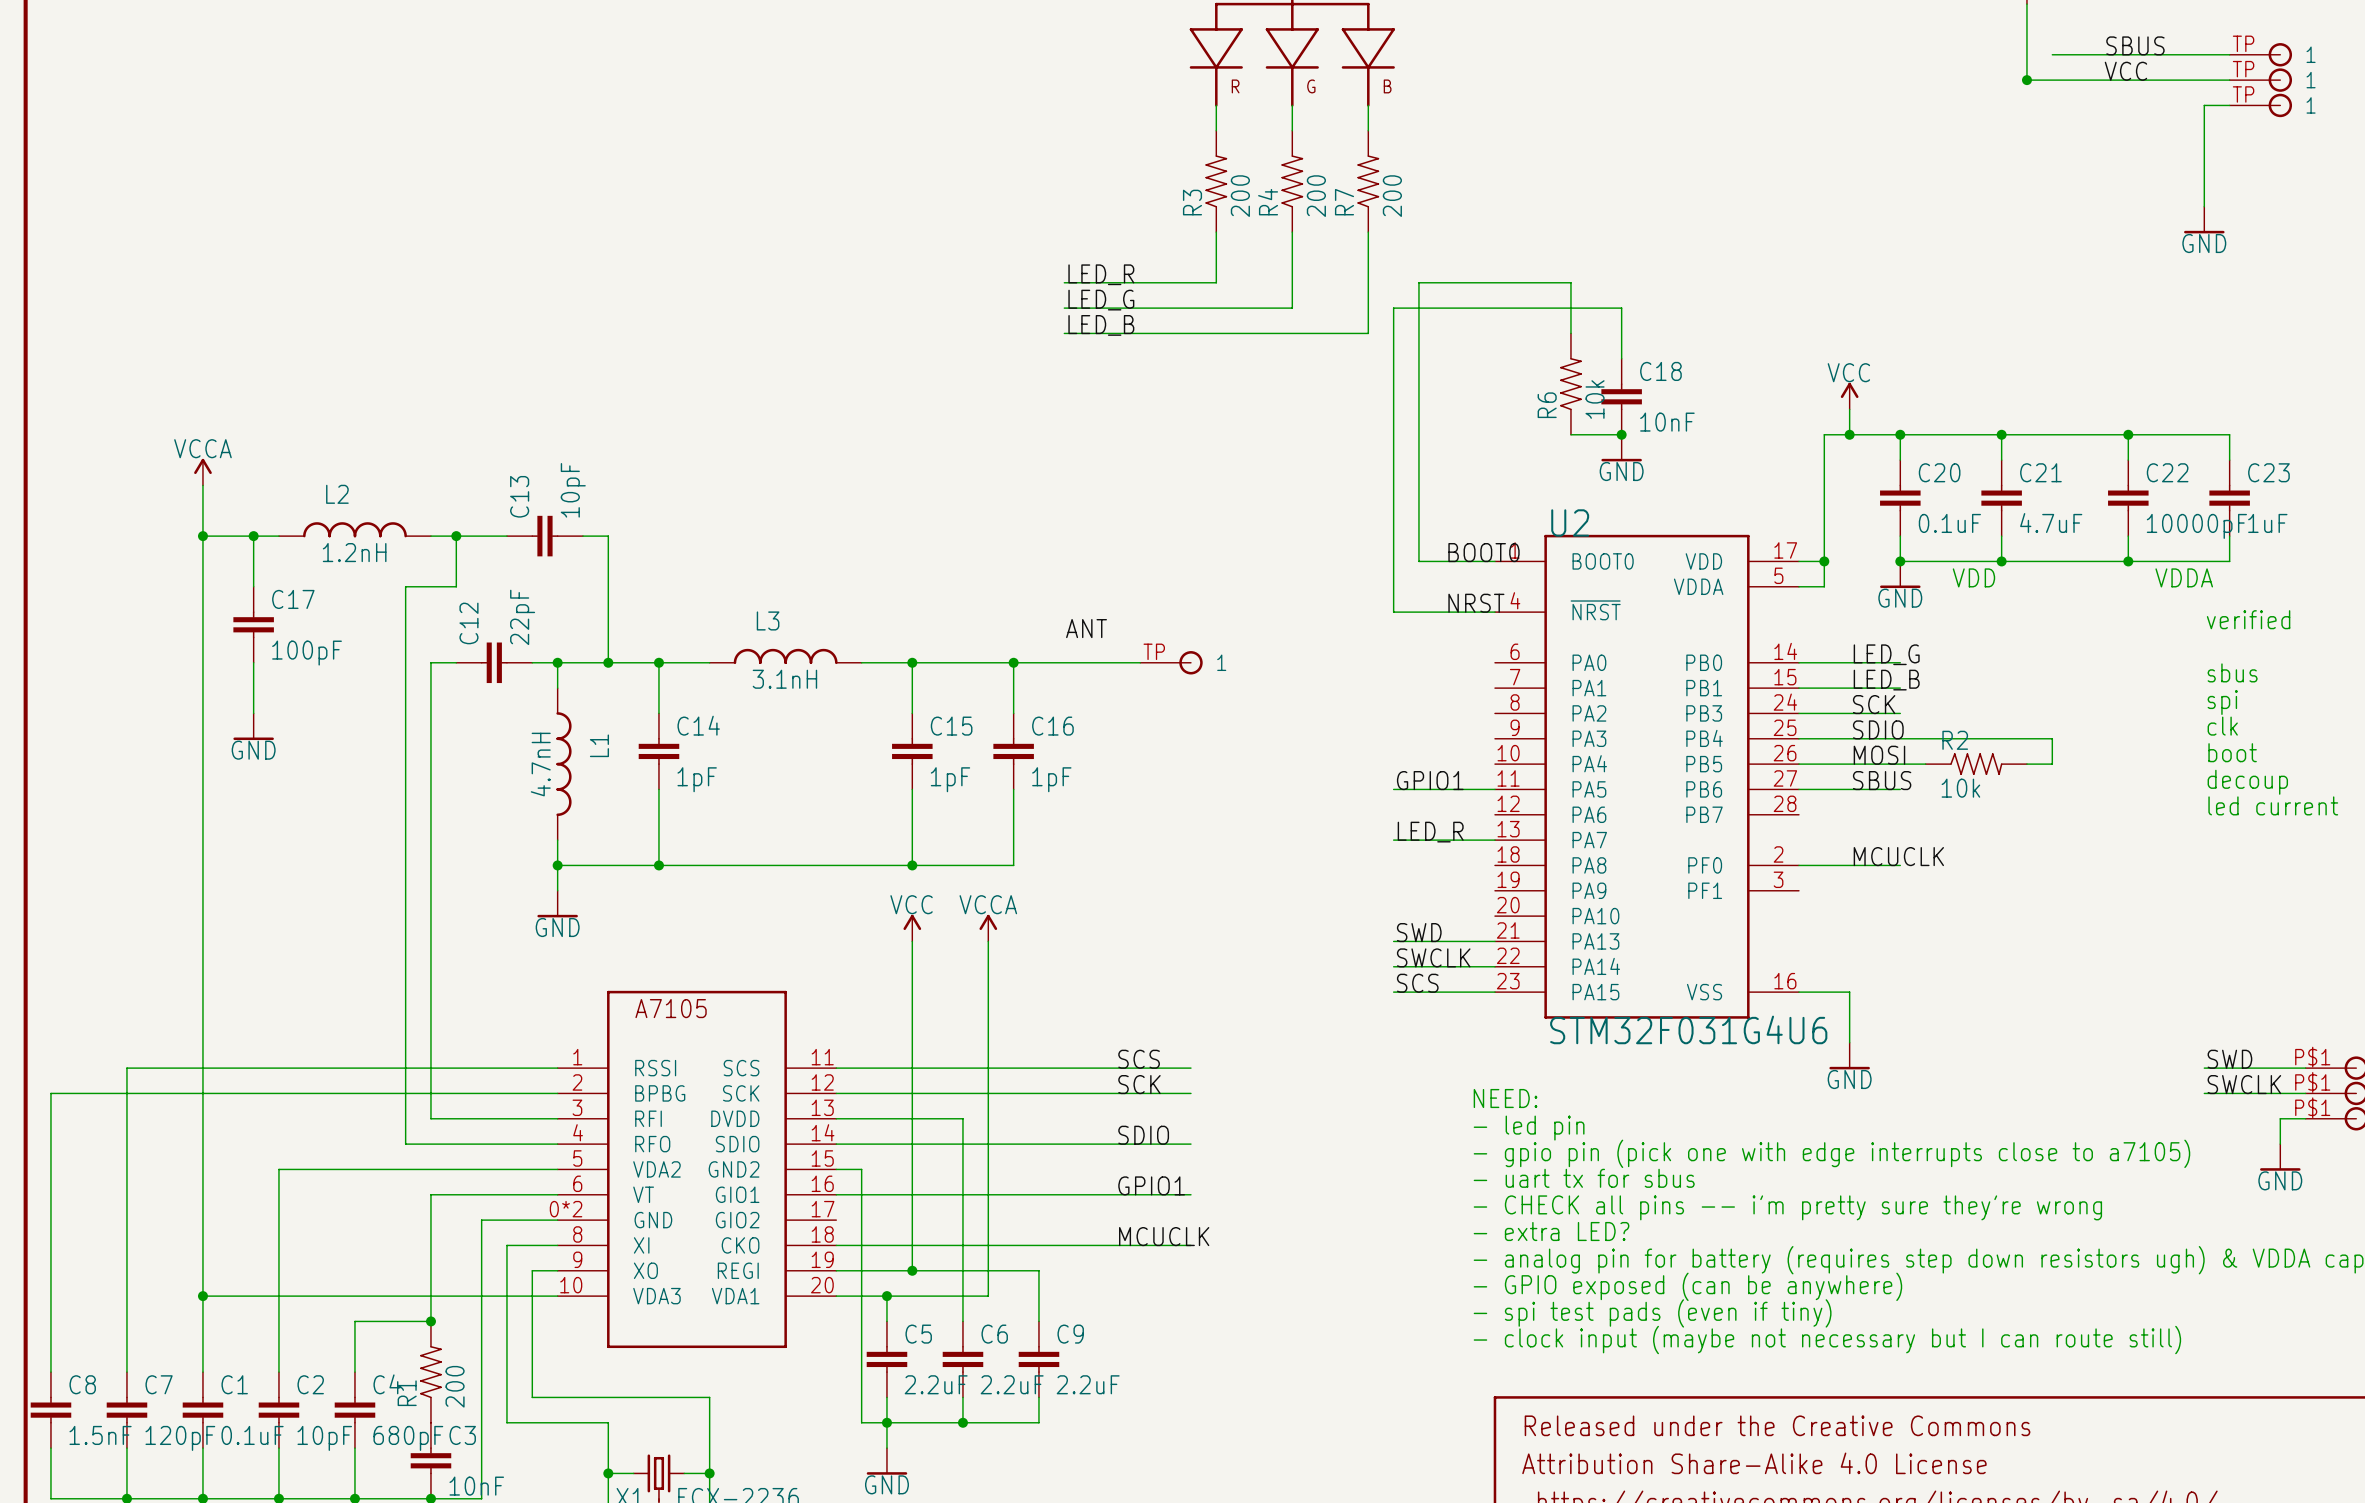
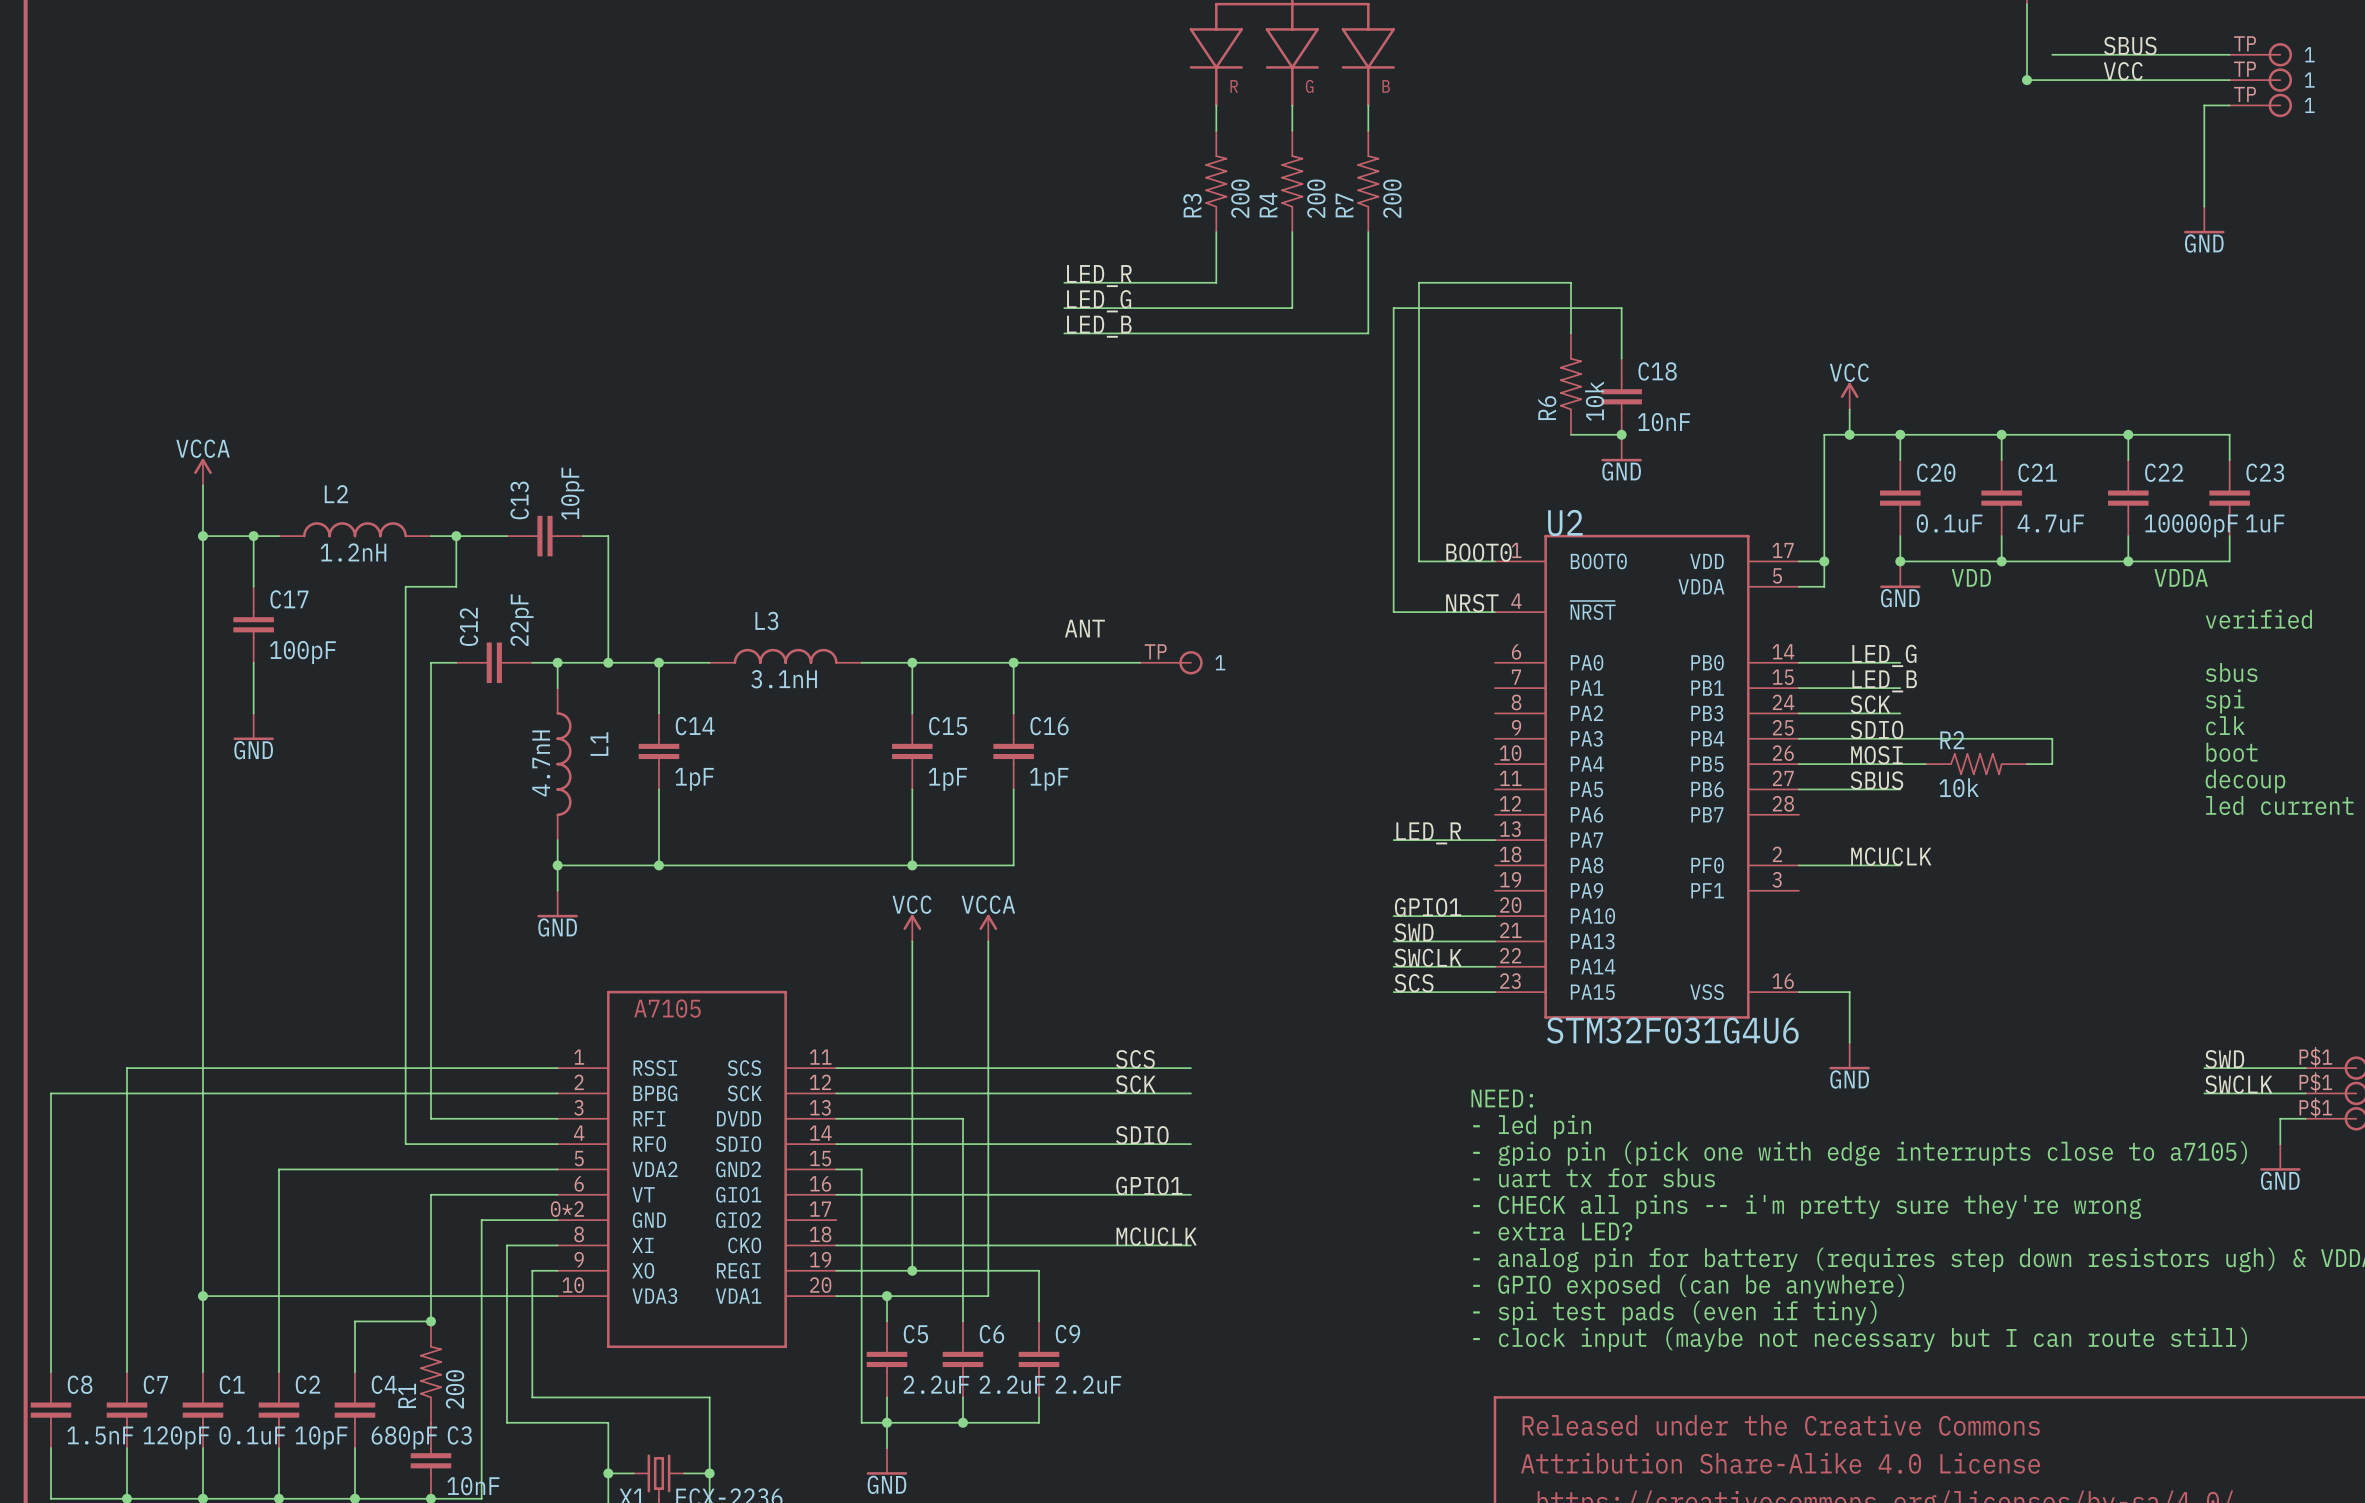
label position: GPIO1 (1430, 780) -> GPIO1 (1428, 907)
wire: (1393, 789) (1494, 789) -> (1393, 916) (1494, 916)

